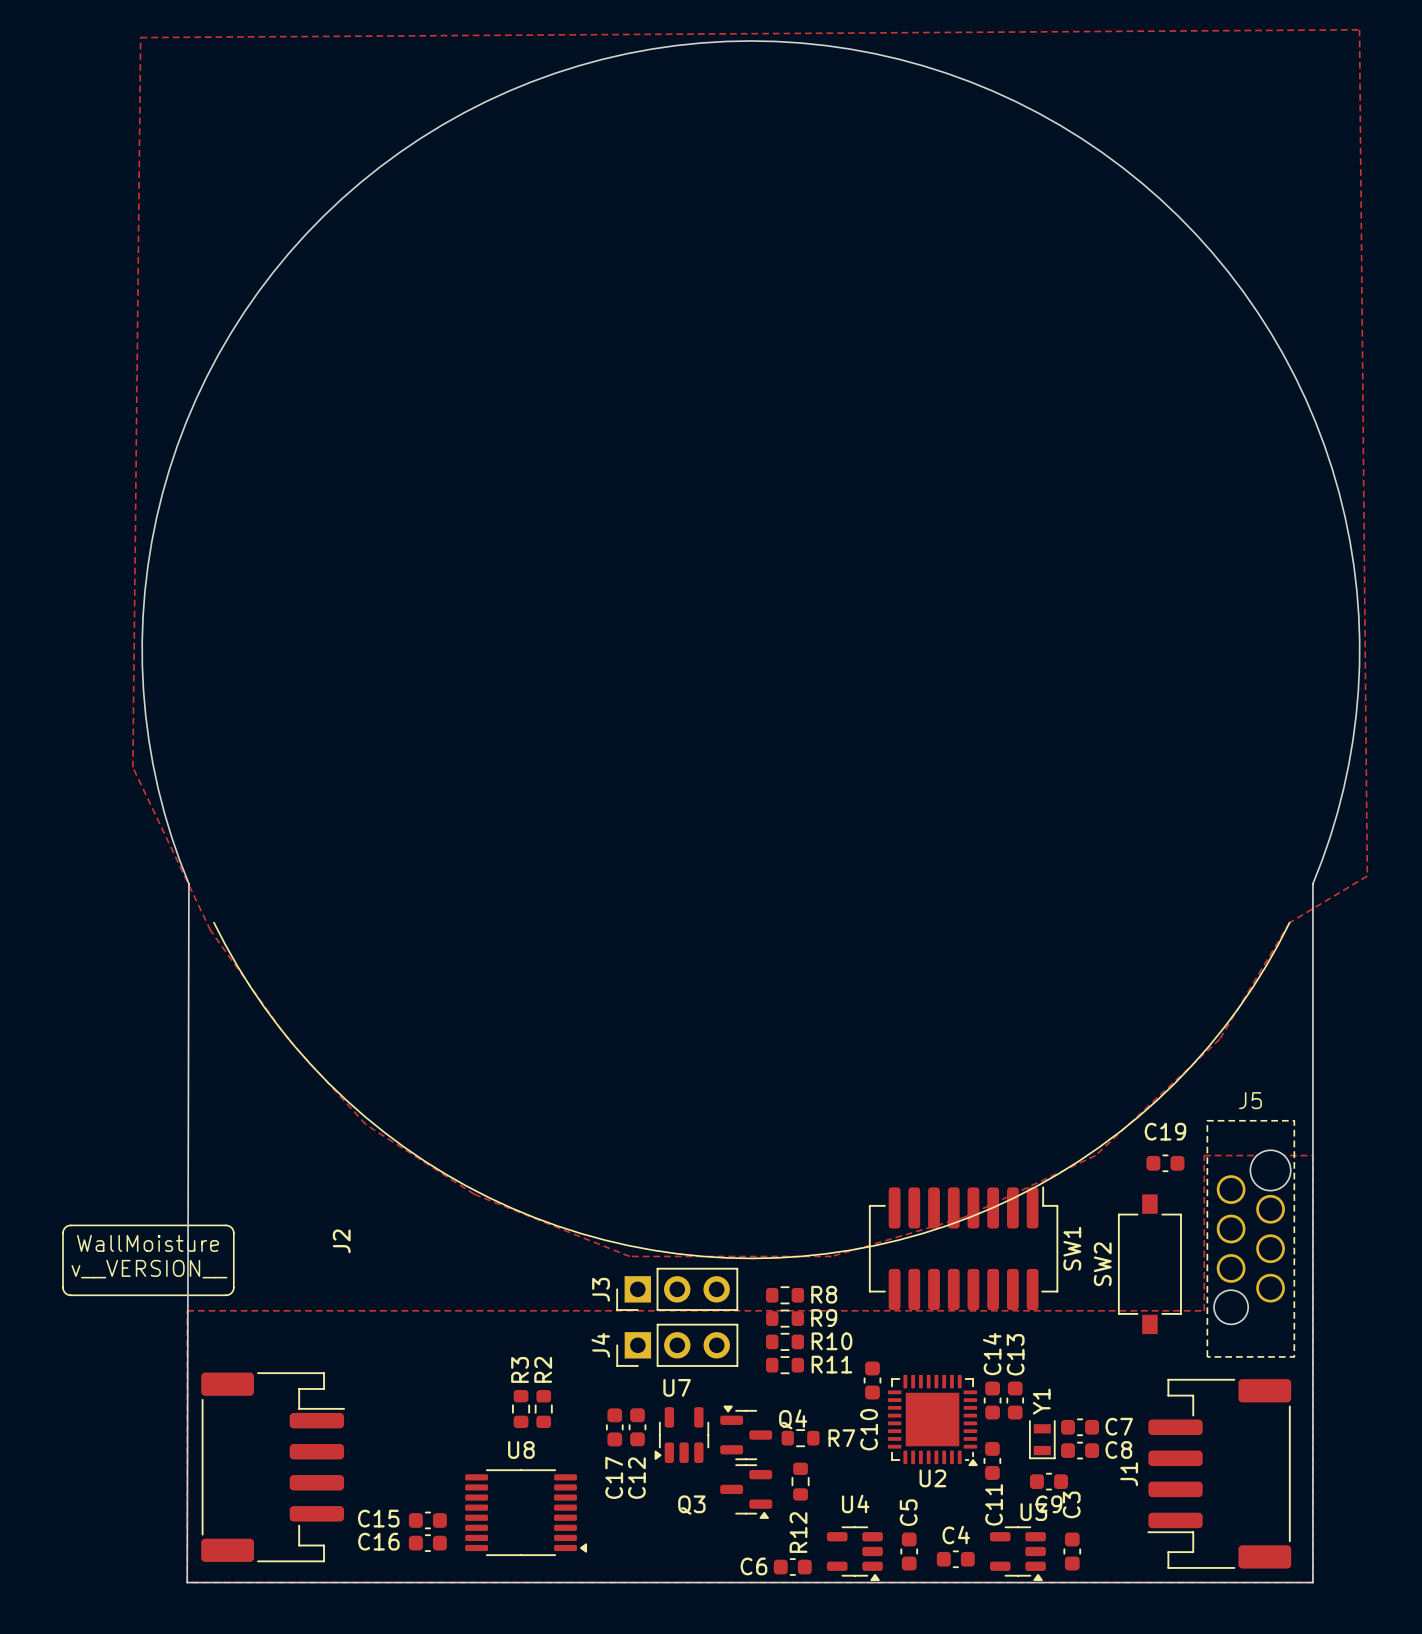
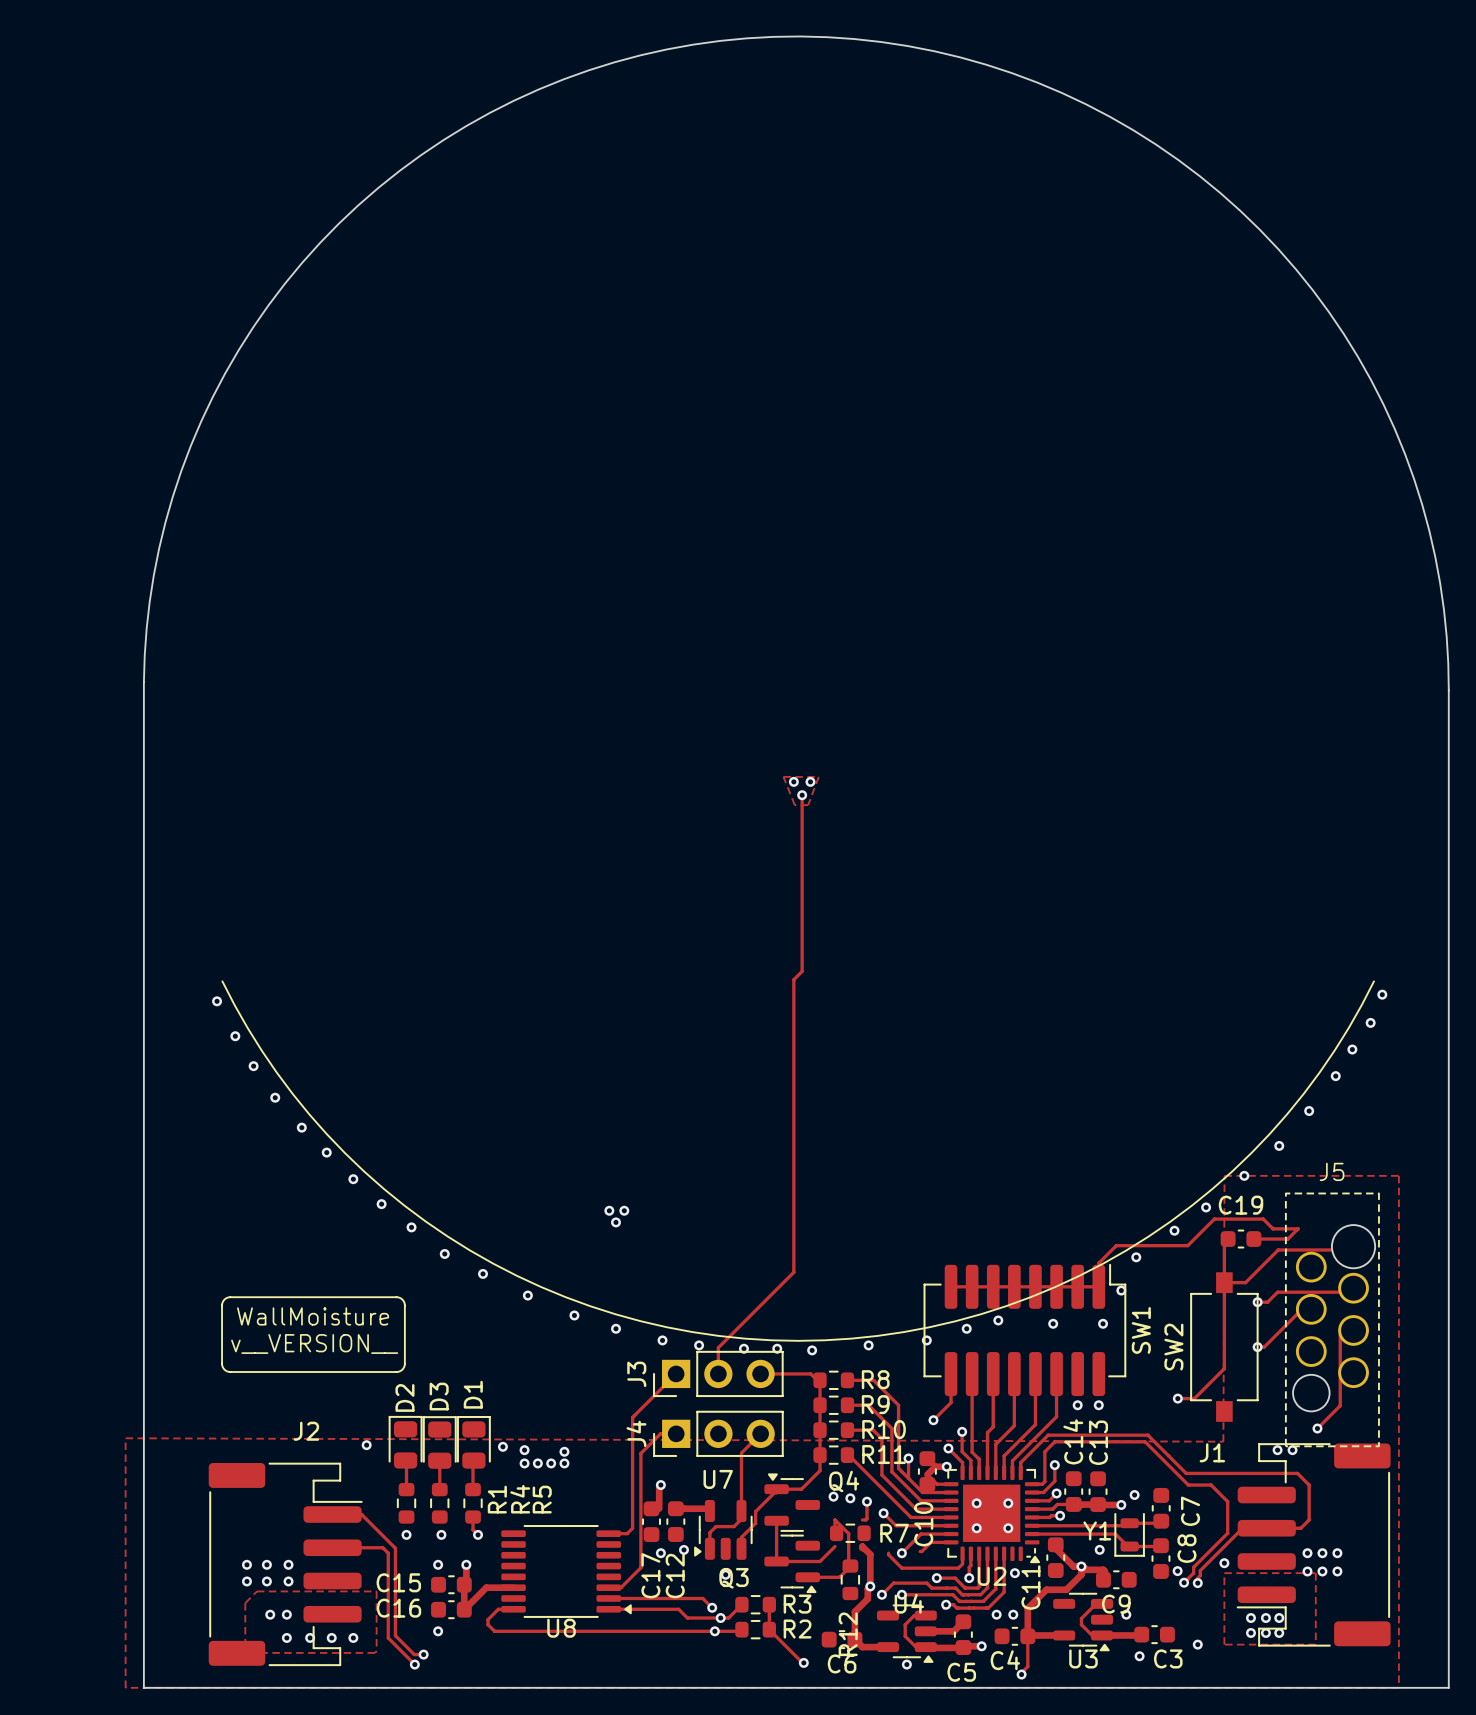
zone outline: (1359, 29) (140, 37) (132, 767) (210, 930) (288, 1039) (365, 1124) (474, 1194) (629, 1256) (831, 1256) (963, 1217) (1095, 1155) (1219, 1039) (1289, 922) (1367, 876) (1359, 29) -> none
zone outline: none -> (783, 776) (818, 776) (808, 805) (794, 805) (783, 776)
via: none -> (793, 781)
via: none -> (810, 781)
via: none -> (802, 795)
track: none -> (802, 798) (802, 971) (793, 979) (793, 1272) (718, 1347) (719, 1373)
via: none -> (1382, 994)
via: none -> (217, 1001)
via: none -> (1370, 1022)
via: none -> (235, 1036)
via: none -> (1352, 1049)
via: none -> (253, 1066)
via: none -> (1335, 1076)
via: none -> (275, 1097)
via: none -> (1309, 1111)
via: none -> (301, 1127)
via: none -> (1279, 1145)
via: none -> (326, 1152)
via: none -> (1244, 1175)
via: none -> (353, 1179)
via: none -> (381, 1204)
via: none -> (1206, 1207)
via: none -> (609, 1210)
via: none -> (624, 1210)
via: none -> (615, 1222)
via: none -> (411, 1227)
via: none -> (1174, 1230)
zone outline: (1312, 1155) (1204, 1155) (1204, 1310) (187, 1310) (187, 1582) -> (1398, 1230) (1398, 1175) (1224, 1175) (1223, 1441) (125, 1438) (125, 1687) (193, 1687)
track: none -> (1228, 1239) (1224, 1242) (1224, 1368) (1194, 1398) (1177, 1398)
track: none -> (1253, 1239) (1287, 1239) (1298, 1228) (1273, 1228) (1263, 1219) (1214, 1219) (1187, 1245) (1116, 1245) (1098, 1263) (1098, 1286) (1078, 1288)
track: none -> (1340, 1249) (1278, 1249) (1245, 1282) (1224, 1282) (1229, 1288)
via: none -> (444, 1253)
via: none -> (1136, 1257)
via: none -> (483, 1273)
track: none -> (951, 1286) (1077, 1286)
via: none -> (1121, 1290)
track: none -> (1340, 1292) (1277, 1292) (1267, 1302) (1257, 1302)
via: none -> (527, 1295)
via: none -> (1257, 1302)
line: (70, 1225) (229, 1226) (233, 1233) (233, 1290) (226, 1295) (67, 1294) (63, 1288) (63, 1233) (65, 1227) (70, 1225) -> (230, 1297) (399, 1297) (404, 1305) (404, 1366) (396, 1372) (227, 1371) (222, 1364) (222, 1305) (224, 1299) (230, 1297)
track: none -> (1298, 1313) (1264, 1347) (1257, 1347)
via: none -> (574, 1315)
via: none -> (998, 1320)
J2 name rotation: 0° (341, 1241) -> 90° clockwise (306, 1431)
J2 name position: J2 (341, 1241) -> J2 (306, 1431)
via: none -> (1053, 1323)
via: none -> (1103, 1323)
text position: WallMoisture (148, 1243) -> WallMoisture (313, 1316)
via: none -> (615, 1328)
via: none -> (966, 1328)
track: none -> (1340, 1334) (1340, 1405) (1317, 1428)
via: none -> (662, 1340)
via: none -> (926, 1340)
via: none -> (699, 1345)
via: none -> (868, 1345)
via: none -> (1257, 1347)
via: none -> (743, 1348)
via: none -> (777, 1348)
via: none -> (812, 1350)
text position: v__VERSION__ (149, 1269) -> v__VERSION__ (314, 1344)
track: none -> (676, 1373) (632, 1417) (632, 1528) (627, 1533) (608, 1533)
track: none -> (760, 1373) (810, 1373) (817, 1380) (820, 1380) (820, 1470) (801, 1489) (776, 1489) (776, 1492)
track: none -> (951, 1374) (951, 1402) (933, 1420)
track: none -> (972, 1374) (972, 1452) (979, 1459) (979, 1472)
track: none -> (993, 1374) (993, 1426) (987, 1432) (987, 1472)
track: none -> (1014, 1374) (1014, 1425) (995, 1444) (995, 1472)
track: none -> (1035, 1374) (1035, 1424) (1004, 1455) (1004, 1472)
track: none -> (1056, 1374) (1056, 1416) (1012, 1460) (1012, 1472)
track: none -> (847, 1380) (873, 1380) (898, 1405) (898, 1468) (922, 1492) (951, 1492)
via: none -> (1177, 1398)
track: none -> (847, 1405) (868, 1405) (891, 1428) (891, 1471) (921, 1500) (951, 1500)
via: none -> (1077, 1405)
via: none -> (1098, 1405)
via: none -> (933, 1420)
via: none -> (1317, 1428)
track: none -> (847, 1430) (873, 1430) (881, 1438) (881, 1475) (916, 1509) (951, 1509)
track: none -> (962, 1431) (962, 1451) (970, 1460) (970, 1472)
via: none -> (962, 1431)
track: none -> (676, 1433) (660, 1433) (640, 1453) (640, 1567) (620, 1587) (608, 1587)
track: none -> (760, 1433) (741, 1453) (741, 1519) (734, 1526) (716, 1526) (709, 1532) (709, 1548)
D2: none -> (405, 1442)
D3: none -> (439, 1442)
D1: none -> (473, 1442)
via: none -> (366, 1445)
via: none -> (502, 1446)
track: none -> (948, 1448) (962, 1462) (962, 1472)
via: none -> (948, 1448)
via: none -> (524, 1450)
via: none -> (1277, 1450)
via: none -> (1292, 1450)
via: none -> (564, 1451)
track: none -> (847, 1455) (911, 1517) (951, 1517)
track: none -> (908, 1458) (908, 1478)
via: none -> (908, 1458)
track: none -> (406, 1460) (406, 1489)
track: none -> (439, 1460) (439, 1489)
track: none -> (473, 1460) (473, 1489)
via: none -> (524, 1463)
via: none -> (537, 1463)
via: none -> (551, 1463)
via: none -> (564, 1463)
track: none -> (1054, 1465) (1054, 1481) (1043, 1492) (1032, 1492)
via: none -> (1054, 1465)
track: none -> (946, 1466) (935, 1466) (927, 1474) (936, 1484) (951, 1484)
via: none -> (946, 1466)
track: none -> (1020, 1472) (1020, 1462) (1048, 1435) (1147, 1435) (1186, 1473) (1297, 1473) (1309, 1485) (1309, 1519) (1300, 1528) (1242, 1528) (1200, 1570) (1197, 1583)
track: none -> (1032, 1484) (1042, 1484) (1044, 1481) (1044, 1451) (1054, 1441) (1145, 1441) (1188, 1485) (1211, 1485) (1227, 1501) (1227, 1533) (1193, 1567) (1193, 1573) (1184, 1582)
track: none -> (660, 1485) (659, 1486) (659, 1508)
via: none -> (660, 1485)
track: none -> (776, 1490) (755, 1511) (755, 1523) (741, 1537) (741, 1548)
C14 position: (992, 1400) -> (1073, 1491)
C13 position: (1015, 1400) -> (1098, 1491)
track: none -> (1056, 1493) (1049, 1500) (1032, 1500)
via: none -> (1056, 1493)
Y1 name position: Y1 (1041, 1401) -> Y1 (1097, 1530)
via: none -> (1134, 1495)
via: none -> (833, 1496)
via: none -> (850, 1498)
track: none -> (866, 1501) (866, 1518) (862, 1519)
via: none -> (866, 1501)
R3 rotation: 0° (521, 1409) -> 90° clockwise (755, 1604)
R3 position: (521, 1409) -> (755, 1604)
R2 rotation: 0° (543, 1409) -> 90° clockwise (755, 1629)
R2 position: (543, 1409) -> (755, 1629)
R1: none -> (406, 1503)
R4: none -> (439, 1503)
R5: none -> (473, 1503)
via: none -> (976, 1503)
via: none -> (1008, 1503)
track: none -> (1121, 1504) (1057, 1504) (1052, 1509) (1032, 1509)
via: none -> (1121, 1504)
track: none -> (675, 1508) (707, 1508) (709, 1511)
Q4 name position: Q4 (793, 1419) -> Q4 (844, 1481)
track: none -> (883, 1513) (896, 1525) (951, 1525)
via: none -> (883, 1513)
track: none -> (332, 1514) (361, 1514) (395, 1548) (395, 1635) (414, 1654) (423, 1654)
Y1 footprint: [1028, 1420, 1056, 1460] -> [1114, 1512, 1145, 1557]
track: none -> (1060, 1515) (1032, 1517)
via: none -> (1060, 1515)
track: none -> (473, 1517) (473, 1529) (478, 1534)
track: none -> (776, 1520) (776, 1561) (820, 1561) (834, 1546)
track: none -> (1157, 1521) (1155, 1523) (1127, 1523) (1125, 1525) (1032, 1525)
C7 rotation: 0° (1080, 1427) -> 90° clockwise (1161, 1508)
track: none -> (834, 1524) (834, 1519) (848, 1533) (848, 1568) (839, 1577) (807, 1577)
Q4 position: (746, 1432) -> (792, 1502)
via: none -> (976, 1528)
via: none -> (1008, 1528)
track: none -> (951, 1534) (921, 1534) (901, 1553)
track: none -> (1032, 1534) (1115, 1534) (1127, 1546) (1157, 1545)
via: none -> (406, 1534)
via: none -> (441, 1534)
via: none -> (478, 1534)
track: none -> (951, 1542) (930, 1542) (920, 1551)
U8 name position: U8 (521, 1449) -> U8 (561, 1628)
C8 rotation: 0° (1080, 1450) -> 90° clockwise (1160, 1558)
track: none -> (332, 1547) (382, 1547) (388, 1553) (388, 1637) (414, 1664)
track: none -> (862, 1548) (862, 1546) (870, 1554) (870, 1586) (867, 1588) (867, 1598) (854, 1611) (854, 1639) (862, 1647) (887, 1647)
track: none -> (1055, 1548) (1073, 1566) (1105, 1571)
via: none -> (683, 1549)
via: none -> (1099, 1549)
via: none -> (660, 1553)
track: none -> (888, 1553) (901, 1568) (958, 1568) (962, 1563) (962, 1553)
via: none -> (901, 1553)
via: none -> (1307, 1553)
via: none -> (1322, 1553)
via: none -> (1337, 1553)
track: none -> (970, 1553) (969, 1578)
track: none -> (979, 1553) (977, 1588) (965, 1588) (955, 1578) (936, 1578)
track: none -> (987, 1553) (987, 1587) (980, 1594) (962, 1594) (955, 1588) (931, 1588) (926, 1583) (893, 1583) (881, 1594)
track: none -> (995, 1553) (995, 1588) (983, 1601) (959, 1601) (952, 1594) (901, 1594)
track: none -> (1004, 1553) (1004, 1592) (988, 1608) (956, 1608) (953, 1604) (947, 1604) (944, 1608) (946, 1604)
via: none -> (1224, 1563)
via: none -> (246, 1564)
via: none -> (266, 1564)
via: none -> (288, 1564)
via: none -> (438, 1564)
via: none -> (466, 1564)
track: none -> (464, 1566) (466, 1564) (464, 1609) (486, 1587) (513, 1587)
track: none -> (1081, 1566) (1081, 1574) (1066, 1589) (1046, 1589) (1027, 1608) (1027, 1636)
via: none -> (1081, 1566)
via: none -> (1177, 1571)
J1 position: (1219, 1473) -> (1313, 1544)
via: none -> (1307, 1571)
via: none -> (1322, 1571)
via: none -> (1337, 1571)
J1 name rotation: 0° (1129, 1474) -> 90° clockwise (1212, 1452)
J1 name position: J1 (1129, 1474) -> J1 (1212, 1452)
via: none -> (1014, 1573)
zone outline: none -> (1224, 1573) (1315, 1573) (1315, 1644) (1224, 1644) (1224, 1573)
via: none -> (725, 1574)
via: none -> (936, 1578)
via: none -> (969, 1578)
via: none -> (246, 1581)
via: none -> (266, 1581)
via: none -> (288, 1581)
via: none -> (1184, 1582)
via: none -> (1197, 1583)
via: none -> (870, 1586)
Q3 position: (746, 1491) -> (792, 1563)
zone outline: none -> (256, 1591) (376, 1591) (376, 1651) (374, 1652) (251, 1652) (245, 1646) (245, 1603) (256, 1591)
via: none -> (881, 1594)
via: none -> (901, 1594)
track: none -> (608, 1598) (702, 1598) (712, 1607) (709, 1607)
track: none -> (741, 1604) (728, 1618) (687, 1618) (678, 1609) (608, 1609)
track: none -> (769, 1604) (769, 1629) (803, 1662)
via: none -> (946, 1604)
C11 name position: C11 (994, 1504) -> C11 (1030, 1587)
track: none -> (1101, 1603) (1096, 1603) (1081, 1618) (1081, 1624) (1092, 1635) (1140, 1635)
C3 name position: C3 (1071, 1504) -> C3 (1168, 1658)
via: none -> (712, 1607)
track: none -> (513, 1609) (498, 1609) (487, 1619) (487, 1624) (494, 1631) (740, 1631) (741, 1629)
U8 position: (526, 1512) -> (566, 1571)
C5 name rotation: 0° (908, 1512) -> 90° clockwise (961, 1672)
C5 name position: C5 (908, 1512) -> C5 (961, 1672)
U3 name position: U3 (1033, 1512) -> U3 (1083, 1658)
via: none -> (270, 1614)
via: none -> (286, 1614)
via: none -> (996, 1614)
via: none -> (1013, 1614)
via: none -> (1126, 1614)
track: none -> (925, 1615) (914, 1615) (905, 1624) (905, 1636) (916, 1647) (981, 1646)
via: none -> (720, 1618)
via: none -> (1250, 1618)
via: none -> (1265, 1618)
via: none -> (1279, 1618)
C15 position: (427, 1520) -> (451, 1584)
track: none -> (963, 1621) (953, 1631) (925, 1631)
via: none -> (438, 1631)
via: none -> (714, 1631)
via: none -> (1250, 1632)
via: none -> (1265, 1632)
via: none -> (1279, 1632)
track: none -> (1064, 1635) (1027, 1636)
track: none -> (1027, 1636) (1027, 1666) (1021, 1674)
via: none -> (286, 1637)
via: none -> (310, 1637)
via: none -> (331, 1637)
via: none -> (353, 1637)
C4 name position: C4 (956, 1535) -> C4 (1005, 1660)
via: none -> (1197, 1644)
C16 position: (427, 1543) -> (451, 1609)
via: none -> (981, 1646)
via: none -> (423, 1654)
C5 position: (909, 1551) -> (963, 1634)
C3 rotation: 0° (1072, 1551) -> 90° clockwise (1154, 1634)
U4 position: (854, 1553) -> (906, 1633)
U3 position: (1017, 1553) -> (1083, 1622)
via: none -> (1139, 1656)
via: none -> (803, 1662)
C4 position: (955, 1559) -> (1014, 1636)
via: none -> (414, 1664)
via: none -> (906, 1664)
C6 name position: C6 (753, 1566) -> C6 (842, 1663)
C6 position: (792, 1567) -> (842, 1639)
via: none -> (1021, 1674)
board edge: (187, 1582) (188, 883) (171, 837) (158, 789) (148, 740) (142, 665) (143, 615) (151, 541) (162, 492) (177, 445) (196, 399) (218, 354) (244, 312) (273, 271) (323, 216) (360, 182) (400, 152) (441, 125) (485, 101) (531, 81) (578, 65) (627, 53) (676, 45) (750, 40) (825, 45) (874, 53) (923, 65) (970, 81) (1015, 101) (1059, 125) (1101, 152) (1141, 182) (1178, 216) (1212, 252) (1243, 291) (1283, 354) (1305, 399) (1324, 445) (1339, 492) (1350, 541) (1358, 615) (1359, 665) (1353, 740) (1343, 789) (1330, 837) (1312, 883) (1312, 1582) -> (193, 1687) (143, 1687) (143, 682) (146, 628) (153, 575) (165, 522) (181, 471) (201, 421) (225, 373) (253, 327) (284, 283) (338, 223) (378, 187) (421, 154) (466, 125) (514, 100) (563, 79) (614, 62) (693, 44) (746, 38) (800, 36) (880, 41) (933, 51) (986, 64) (1036, 82) (1085, 104) (1133, 130) (1178, 159) (1220, 192) (1259, 229) (1312, 290) (1343, 334) (1371, 380) (1394, 428) (1414, 479) (1429, 530) (1440, 583) (1448, 663) (1448, 1687) (1398, 1687)

